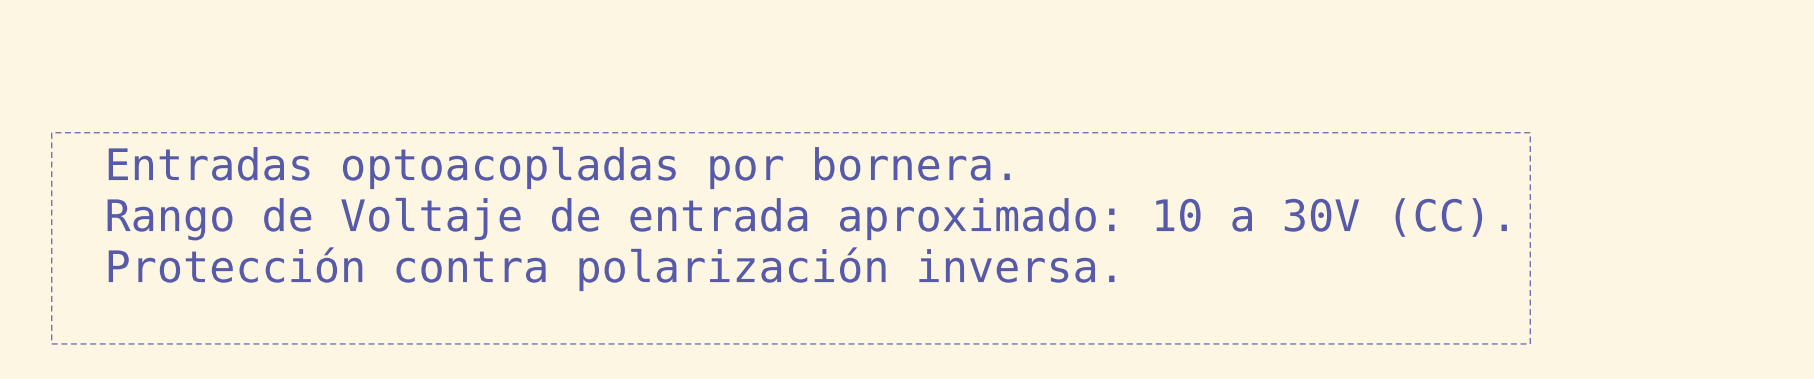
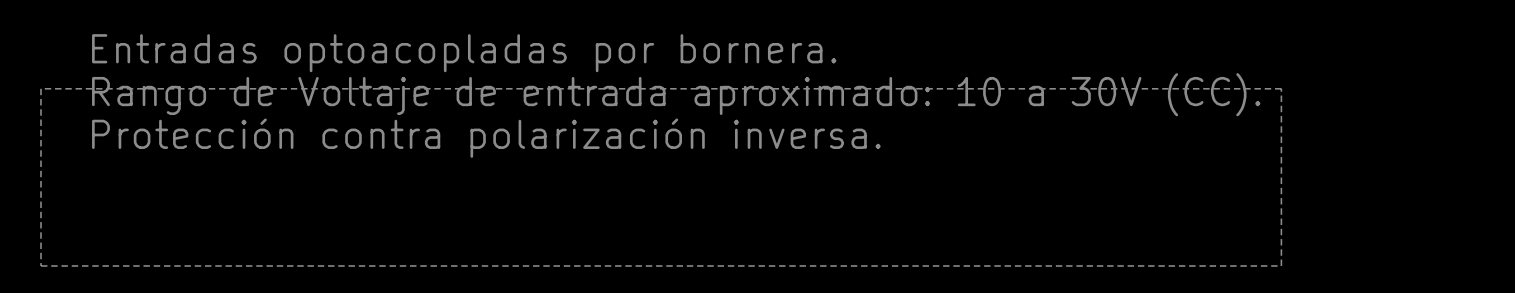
text position: Entradas optoacopladas por bornera. (559, 167) -> Entradas optoacopladas por bornera. (464, 53)
text position: Rango de Voltaje de entrada aproximado: 10 a 30V (CC). (807, 219) -> Rango de Voltaje de entrada aproximado: 10 a 30V (CC). (676, 94)
text position: Protección contra polarización inversa. (611, 269) -> Protección contra polarización inversa. (486, 138)

